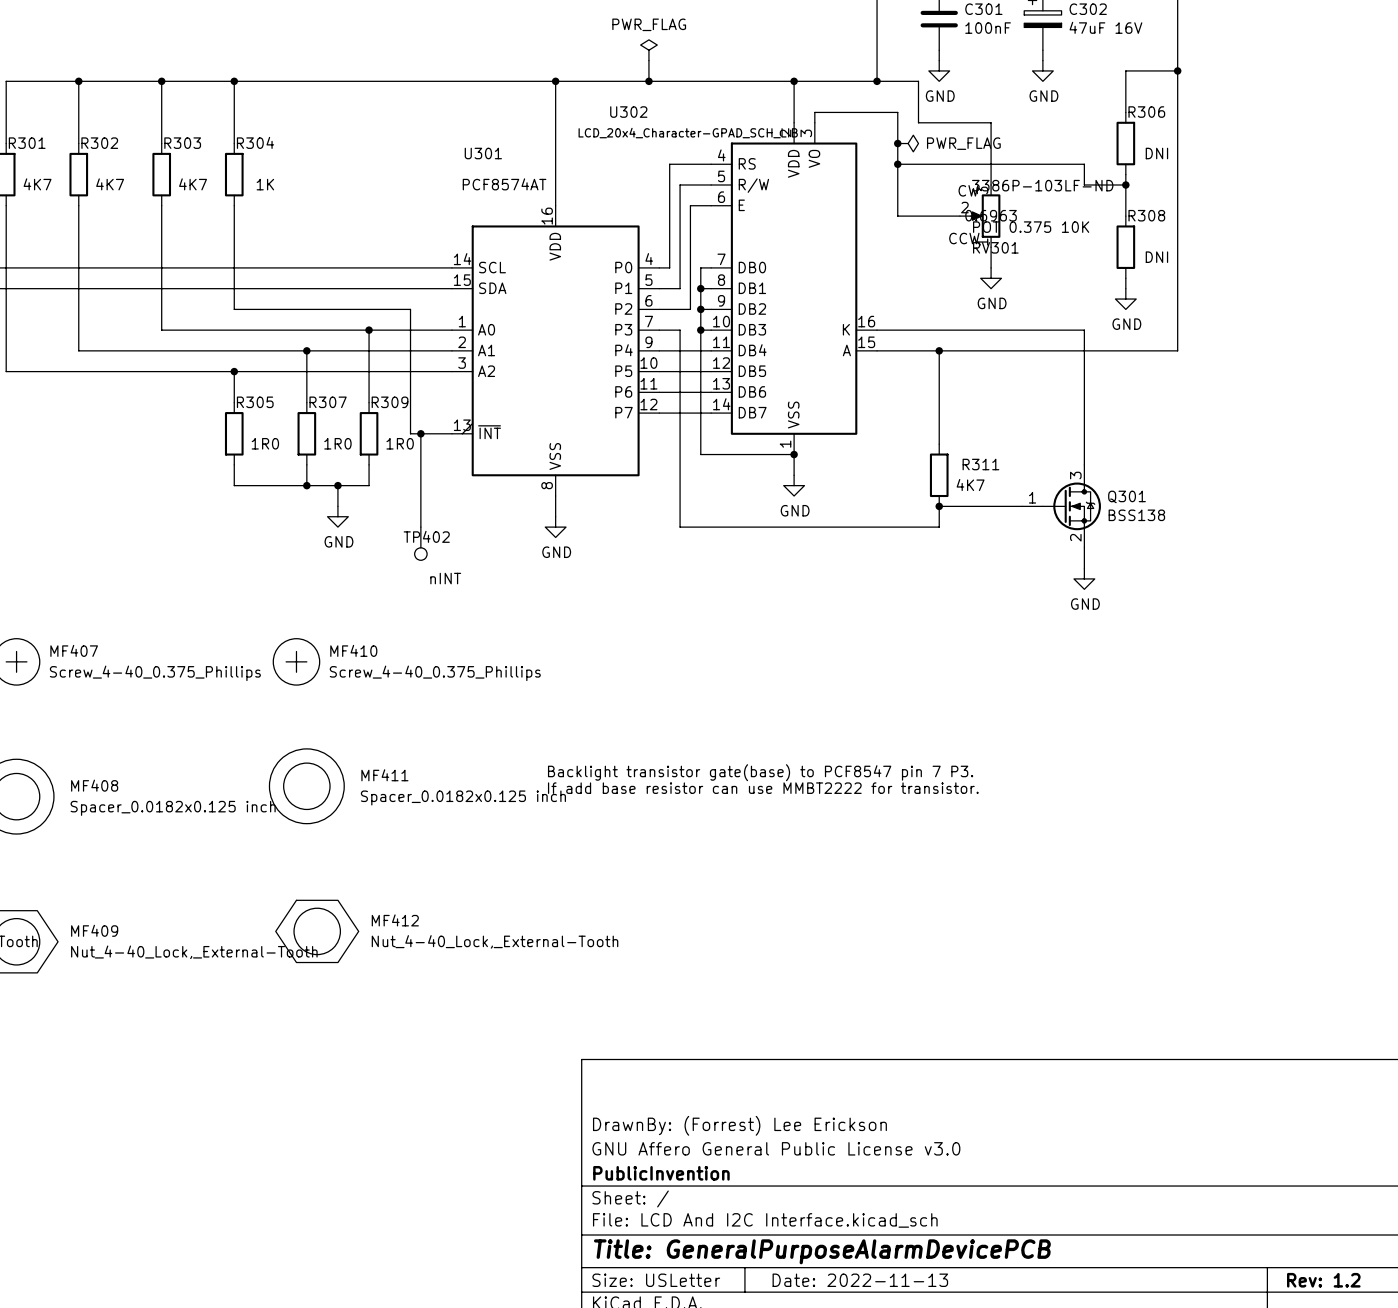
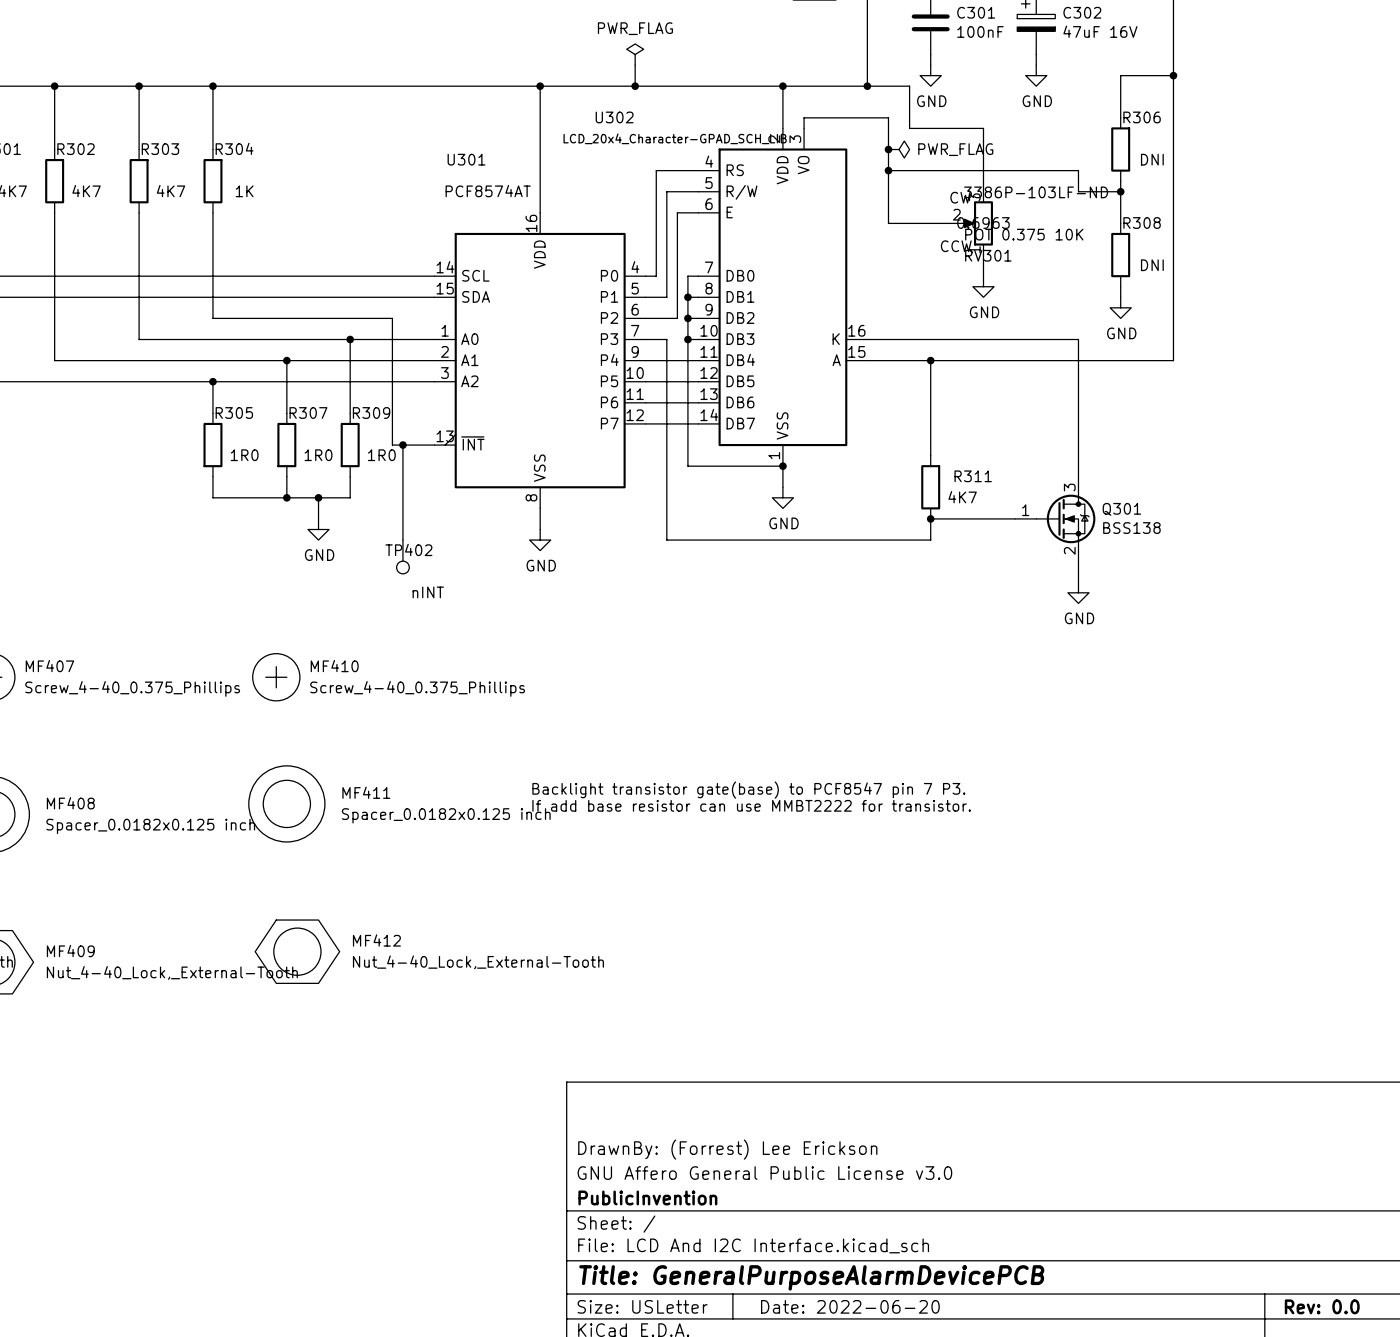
title block: Date: 2022-11-13 (860, 1280) -> Date: 2022-06-20 (850, 1306)
title block: Rev: 1.2 (1323, 1280) -> Rev: 0.0 (1322, 1306)

